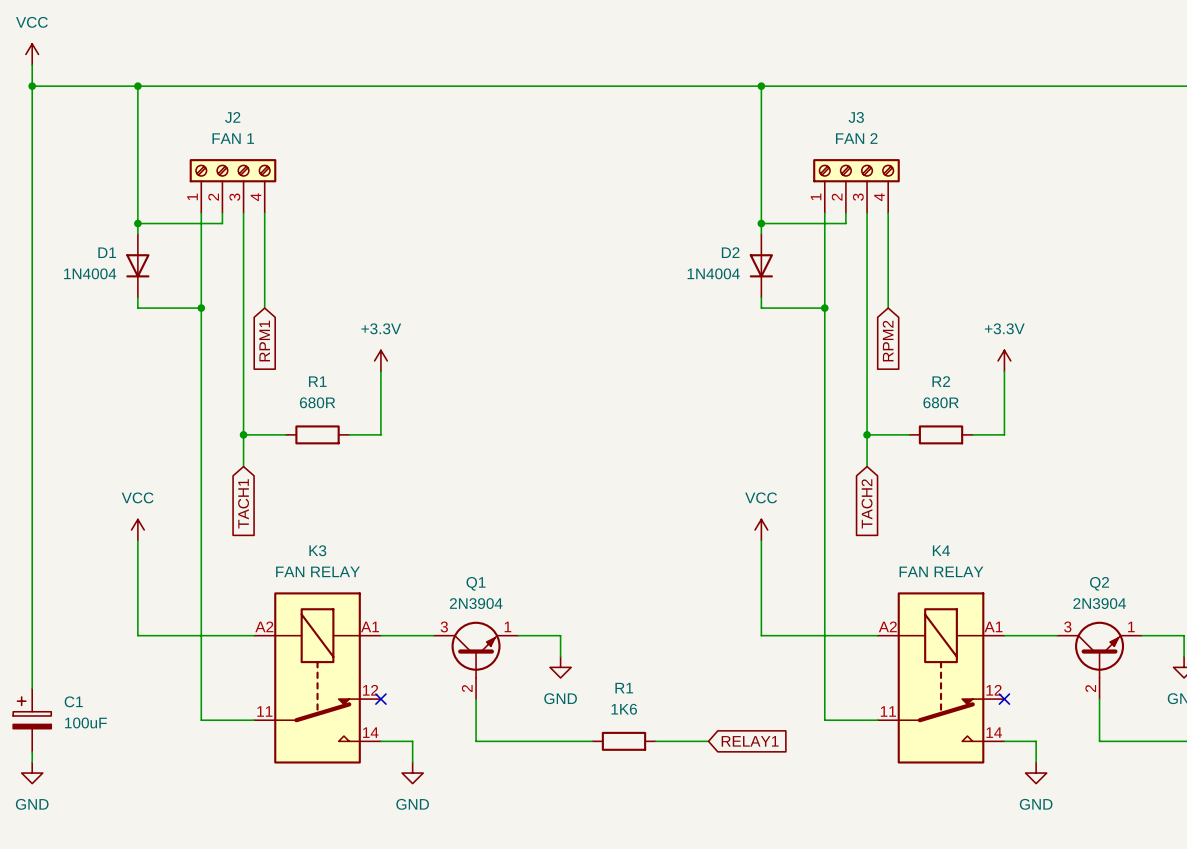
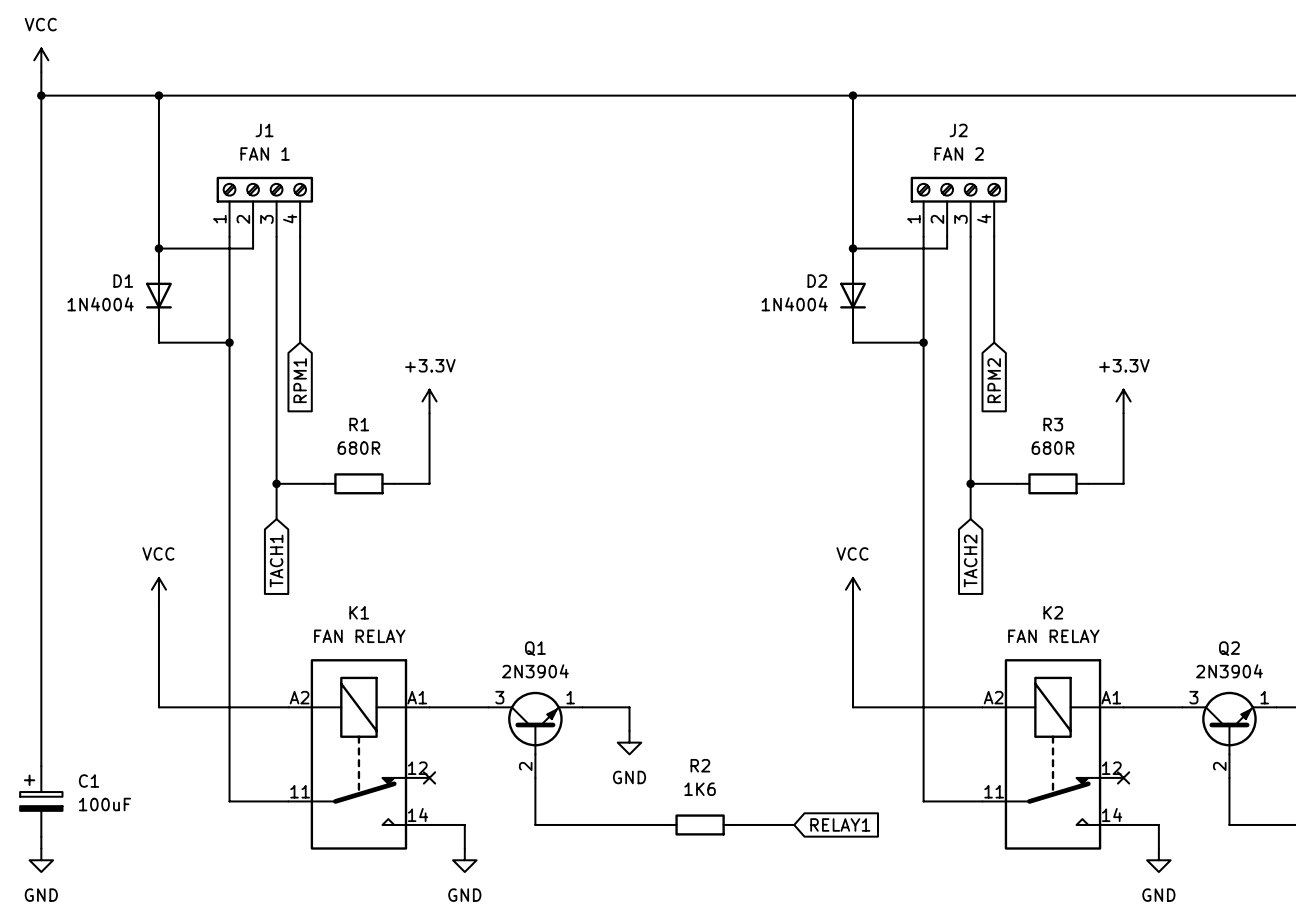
J2 name: J2 (232, 117) -> J1 (264, 130)
J3 name: J3 (856, 117) -> J2 (958, 130)
R2 name: R2 (941, 381) -> R3 (1053, 424)
K3 name: K3 (317, 550) -> K1 (359, 612)
K4 name: K4 (941, 550) -> K2 (1053, 612)
R1 name: R1 (624, 688) -> R2 (700, 765)

